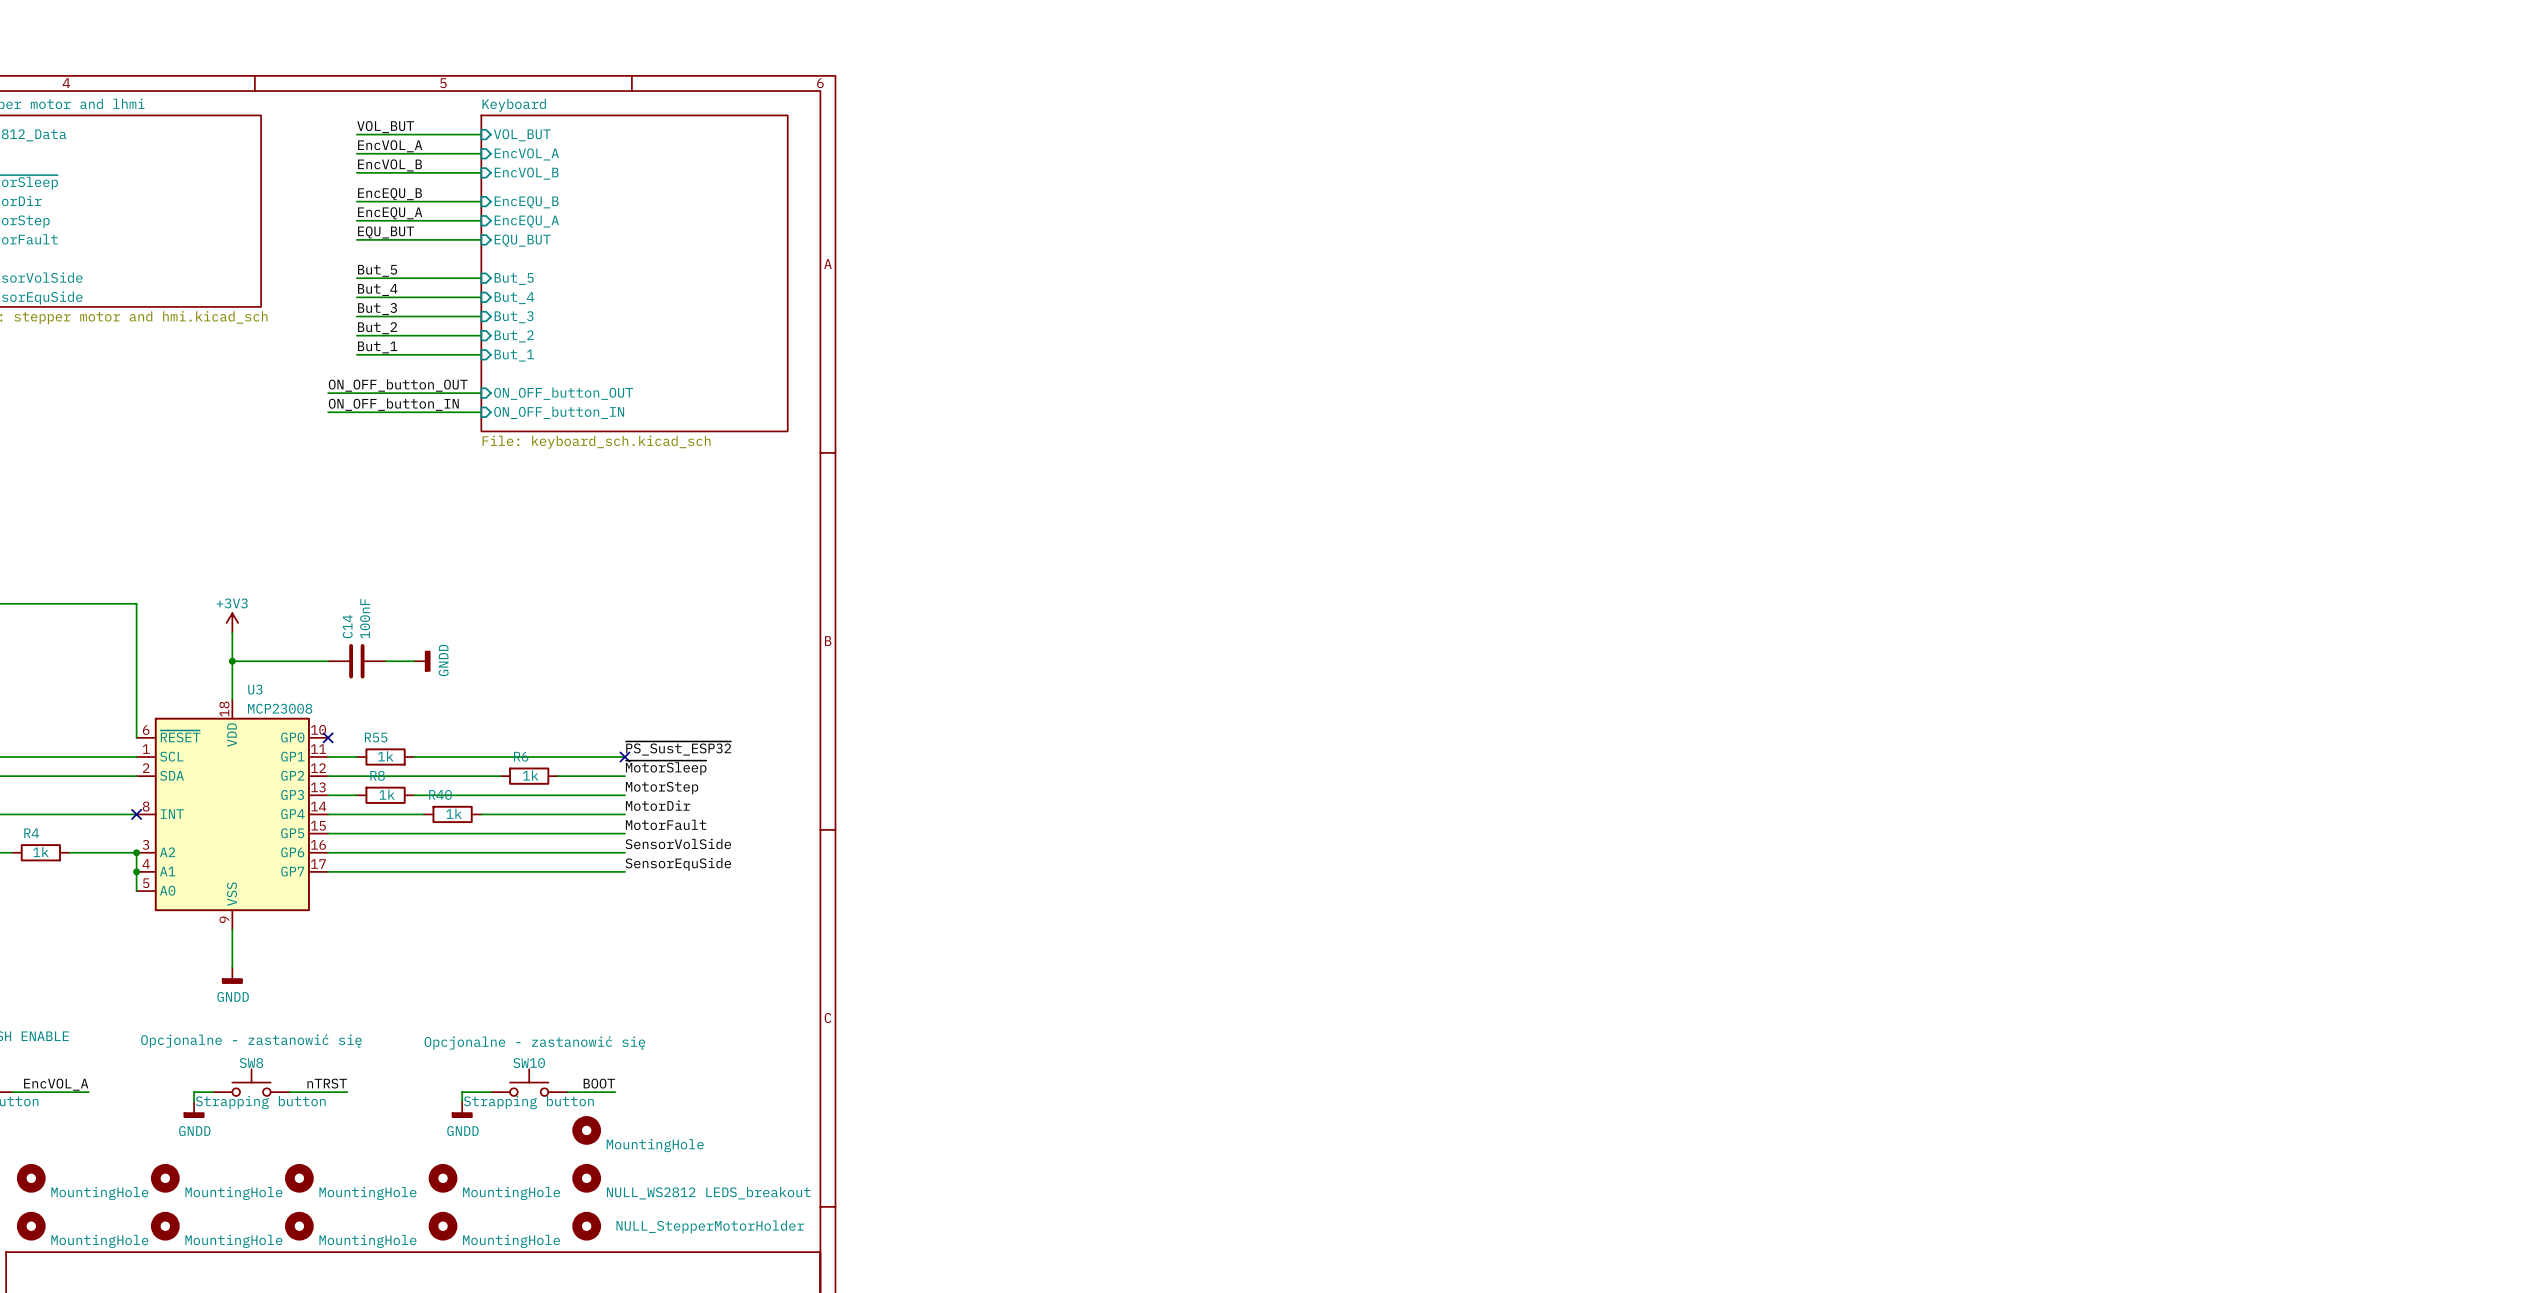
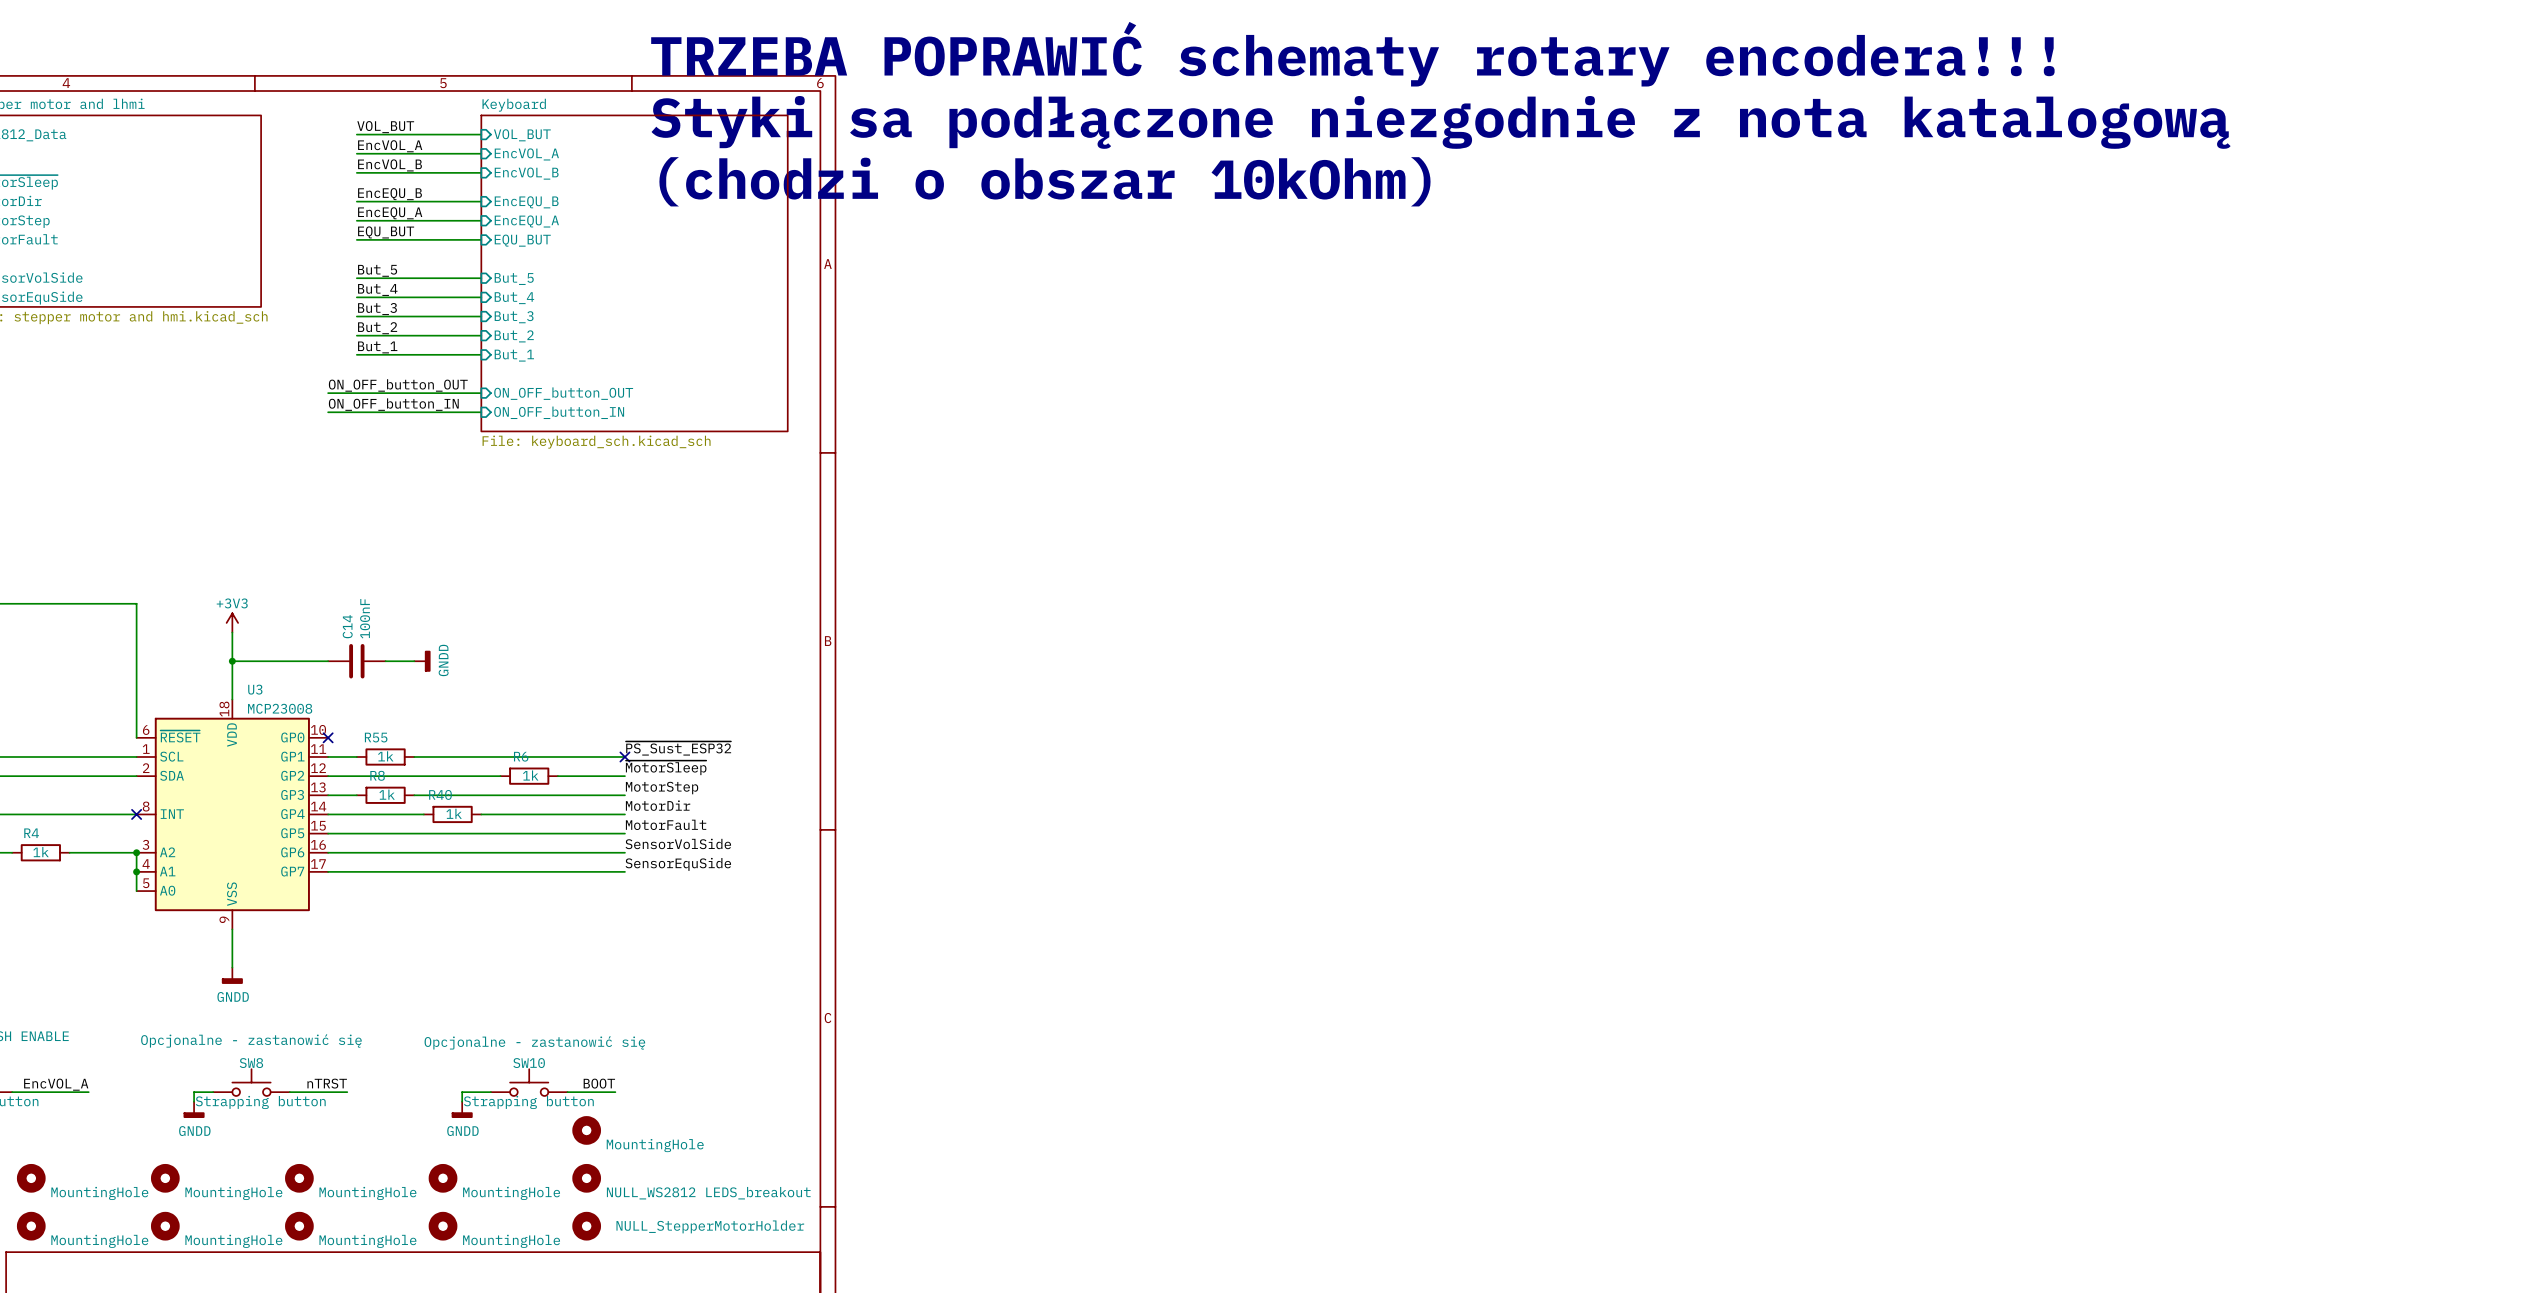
text: none -> TRZEBA POPRAWIĆ schematy rotary encodera!!! (1352, 54)
text: none -> Styki sa podłączone niezgodnie z nota katalogową (1441, 122)
text: none -> (chodzi o obszar 10kOhm) (1044, 181)

